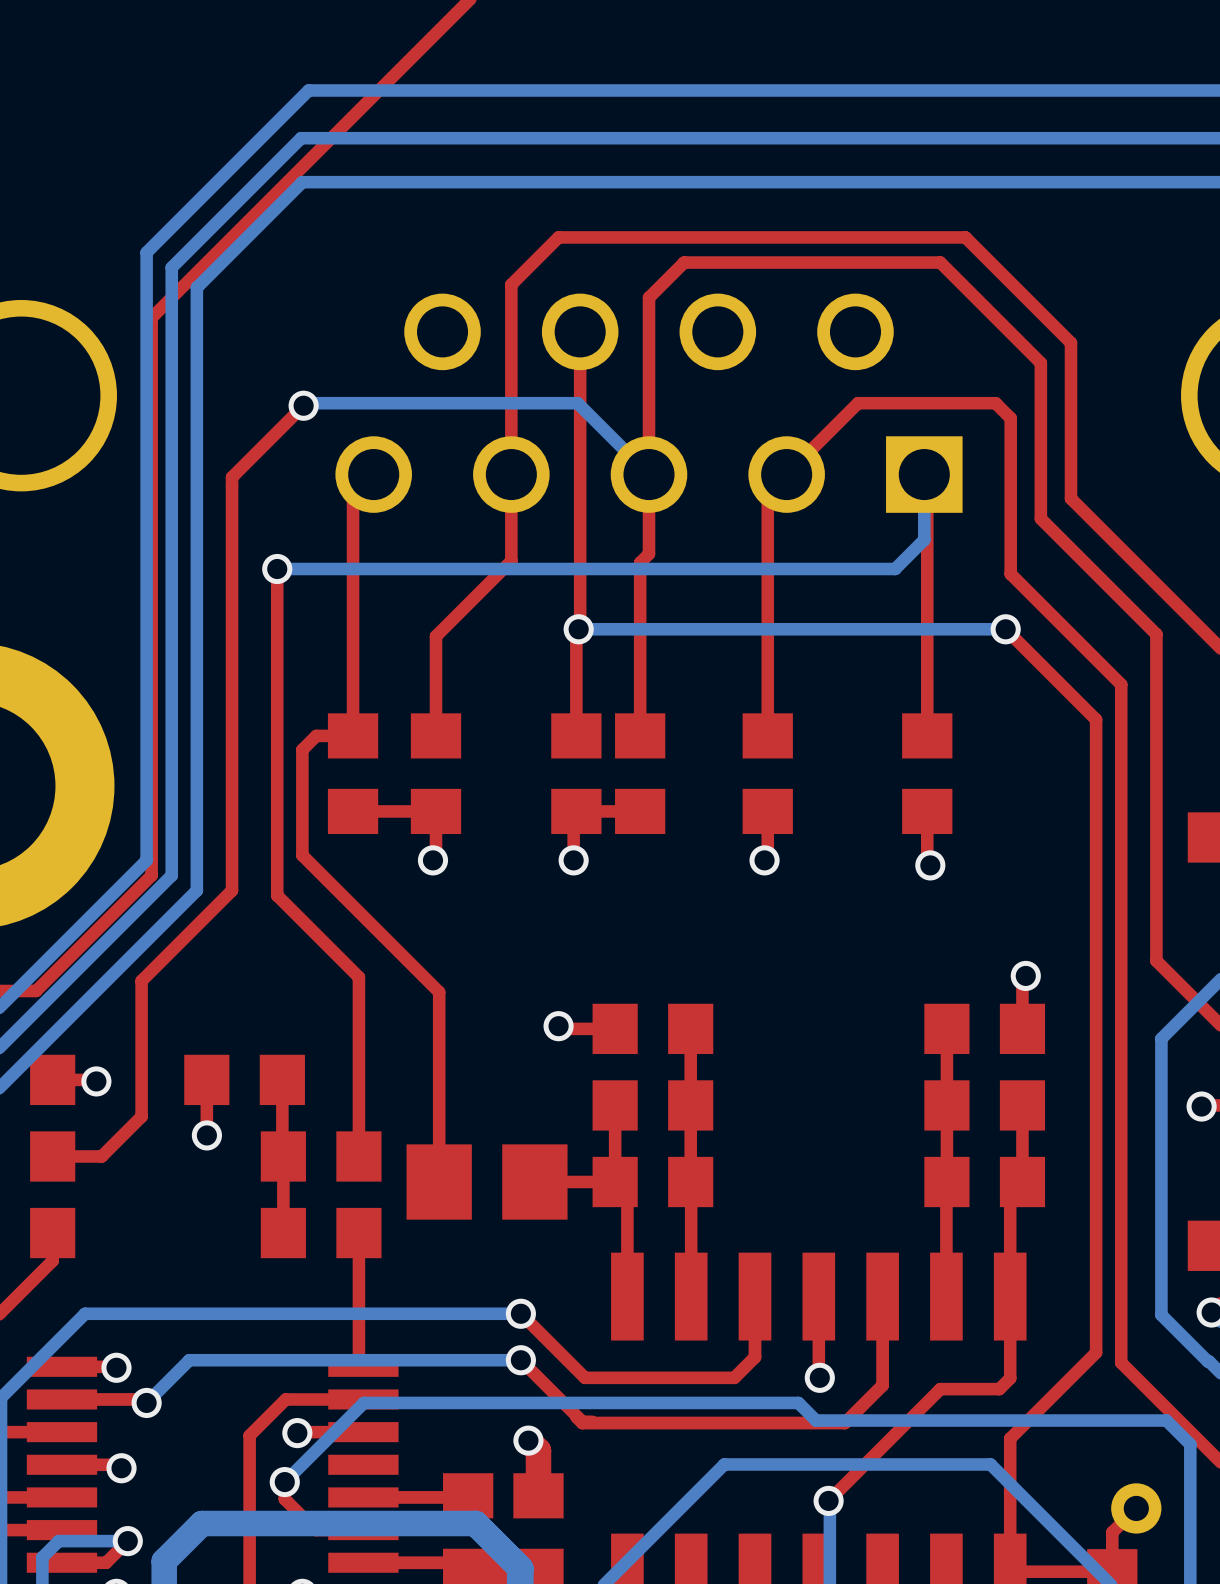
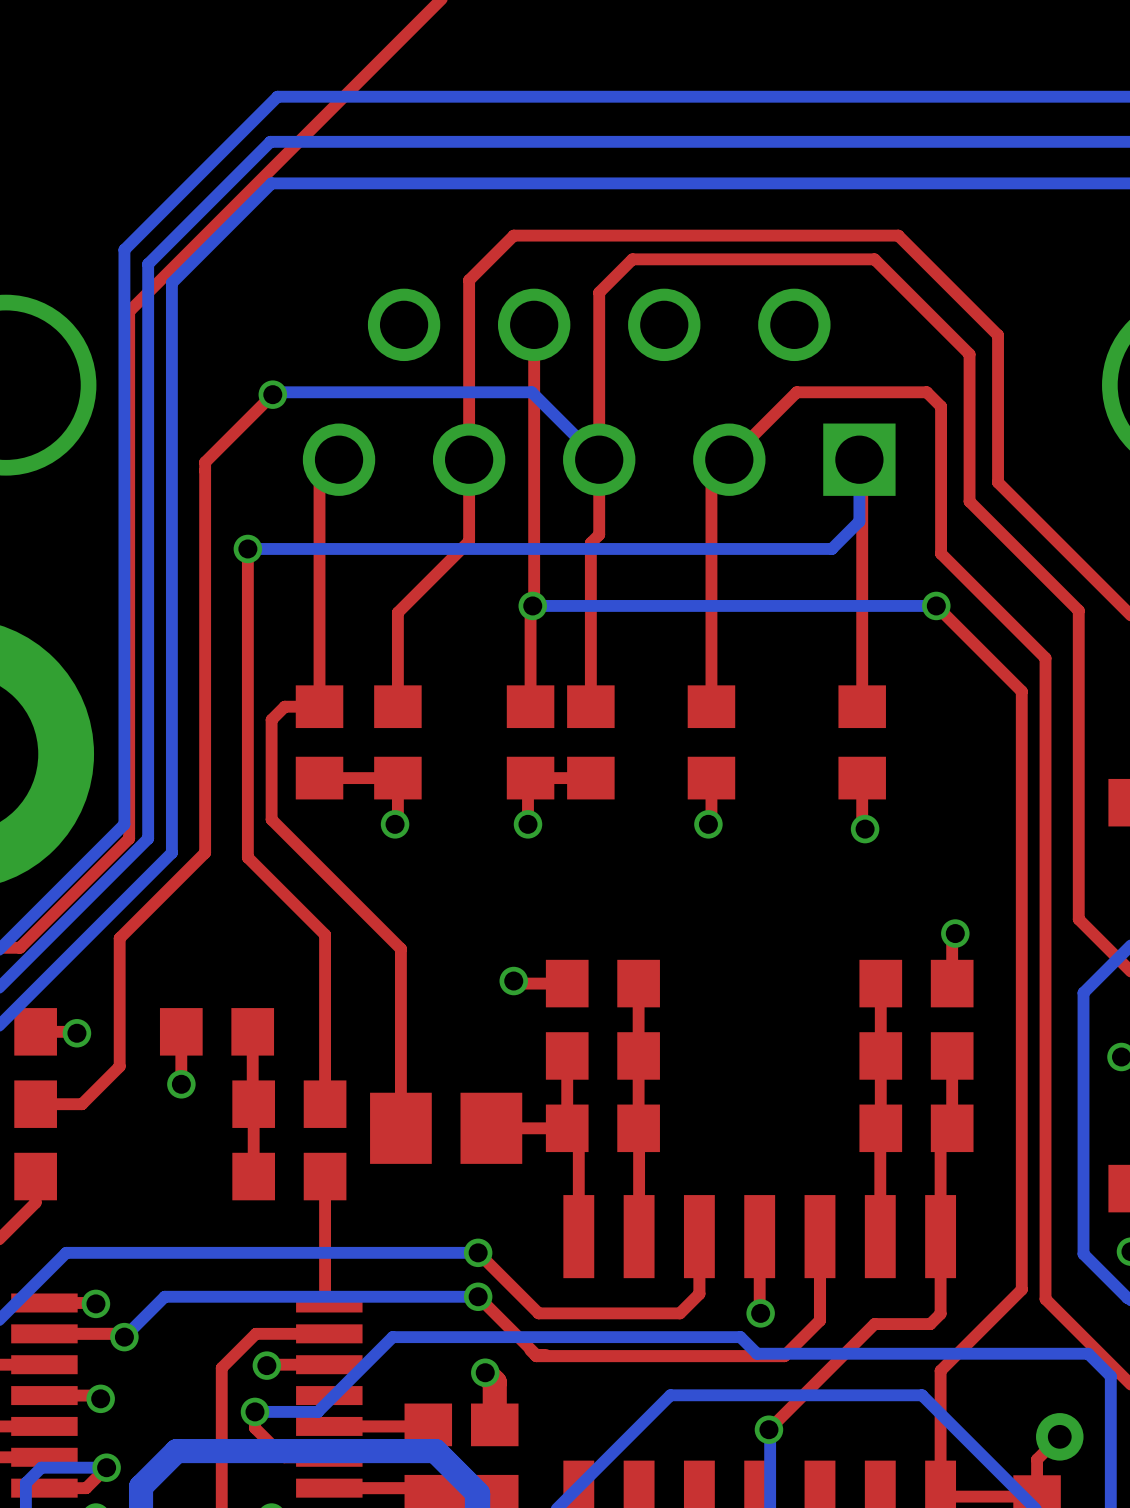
bottom track: (430, 1402) (363, 1402) (284, 1482) -> (392, 1337) (317, 1411) (254, 1411)

